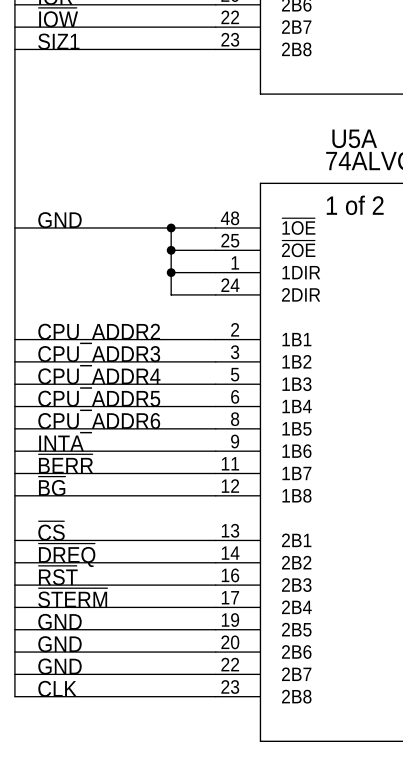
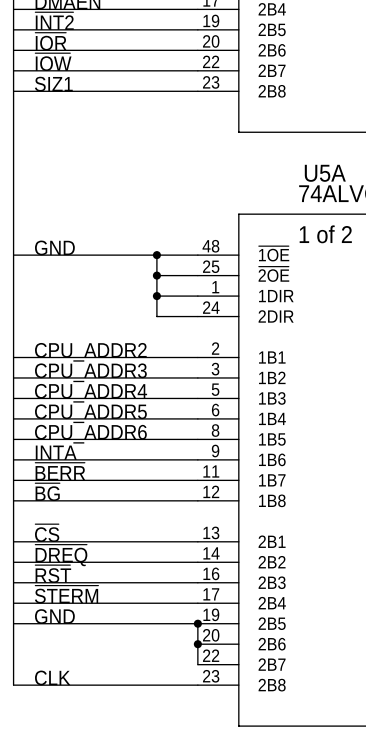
junction: none -> (197, 623)
label: GND (60, 644) -> none
wire: (14, 652) (215, 652) -> none
junction: none -> (197, 644)
label: GND (60, 666) -> none
wire: (14, 674) (215, 674) -> (197, 623) (197, 664)

